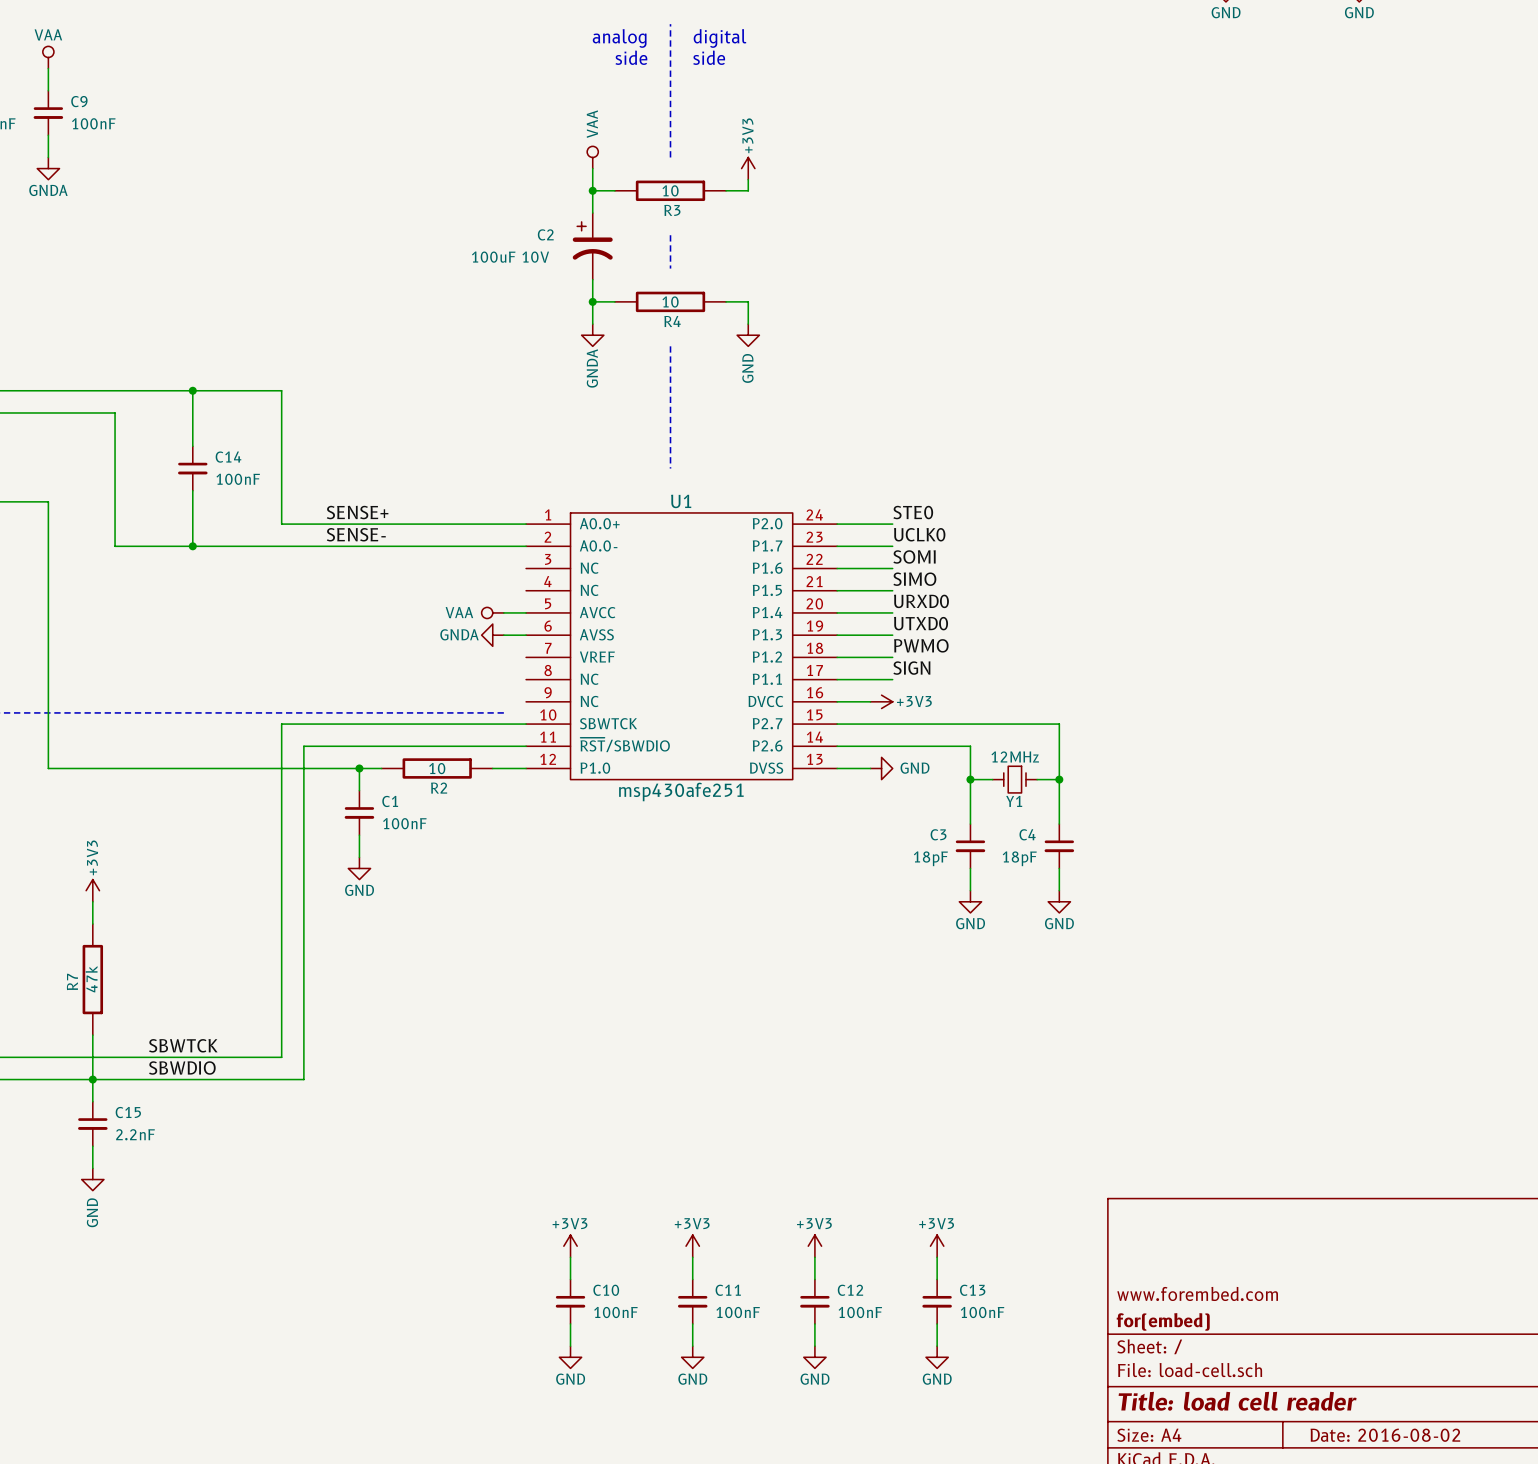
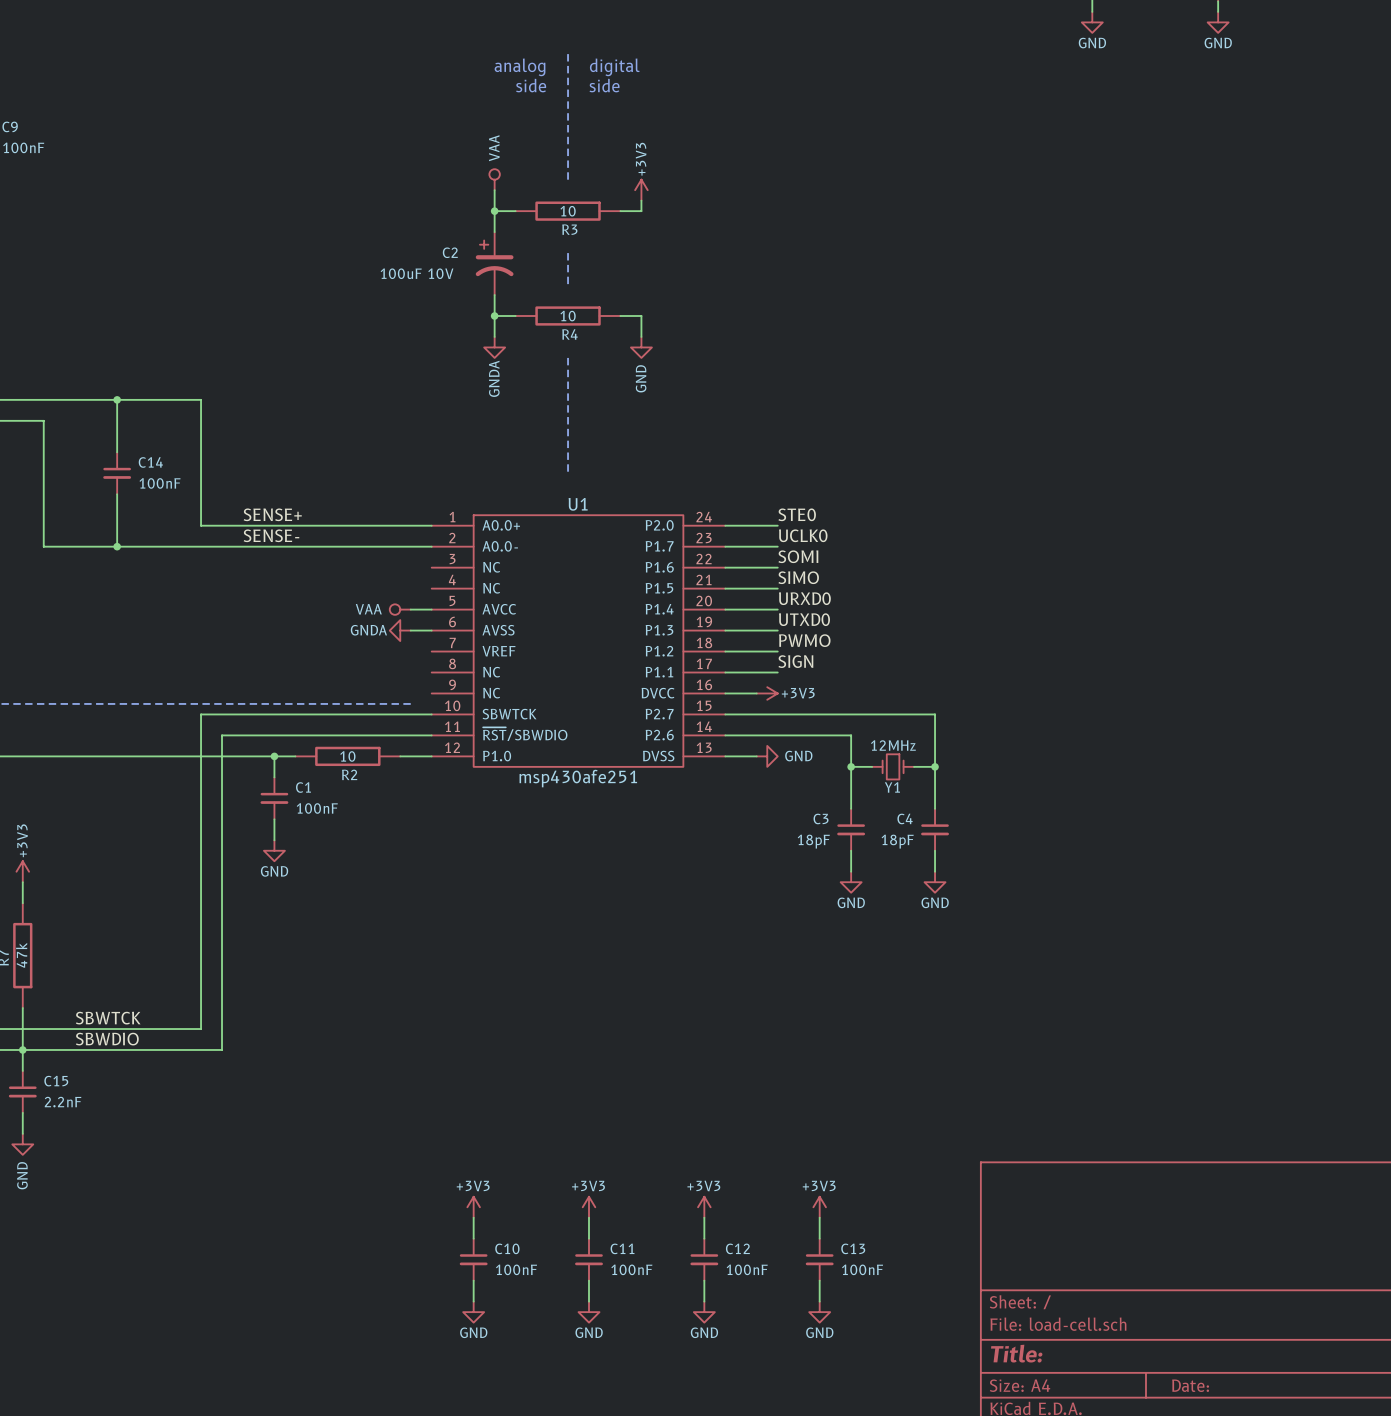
title block: www.forembed.com (1197, 1293) -> none
title block: for(embed) (1163, 1321) -> none
title block: Title: load cell reader (1237, 1401) -> Title: (1016, 1353)
title block: Date: 2016-08-02 (1385, 1435) -> Date: (1190, 1385)

